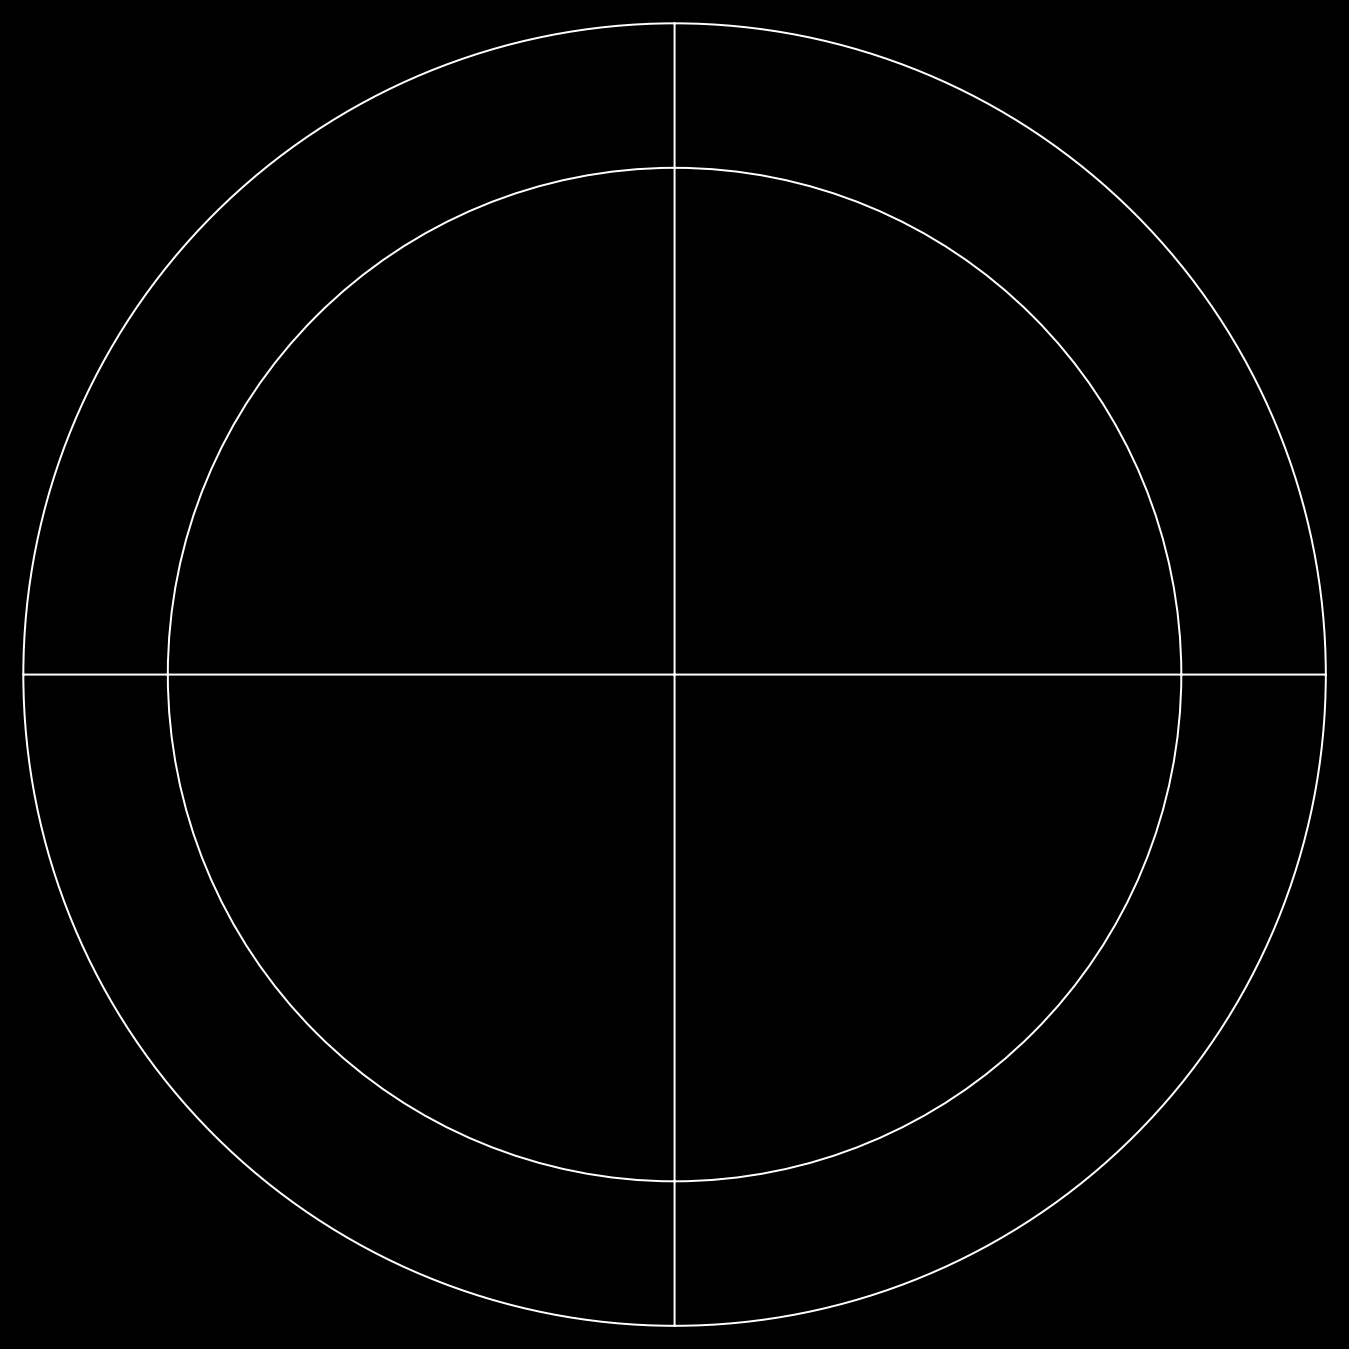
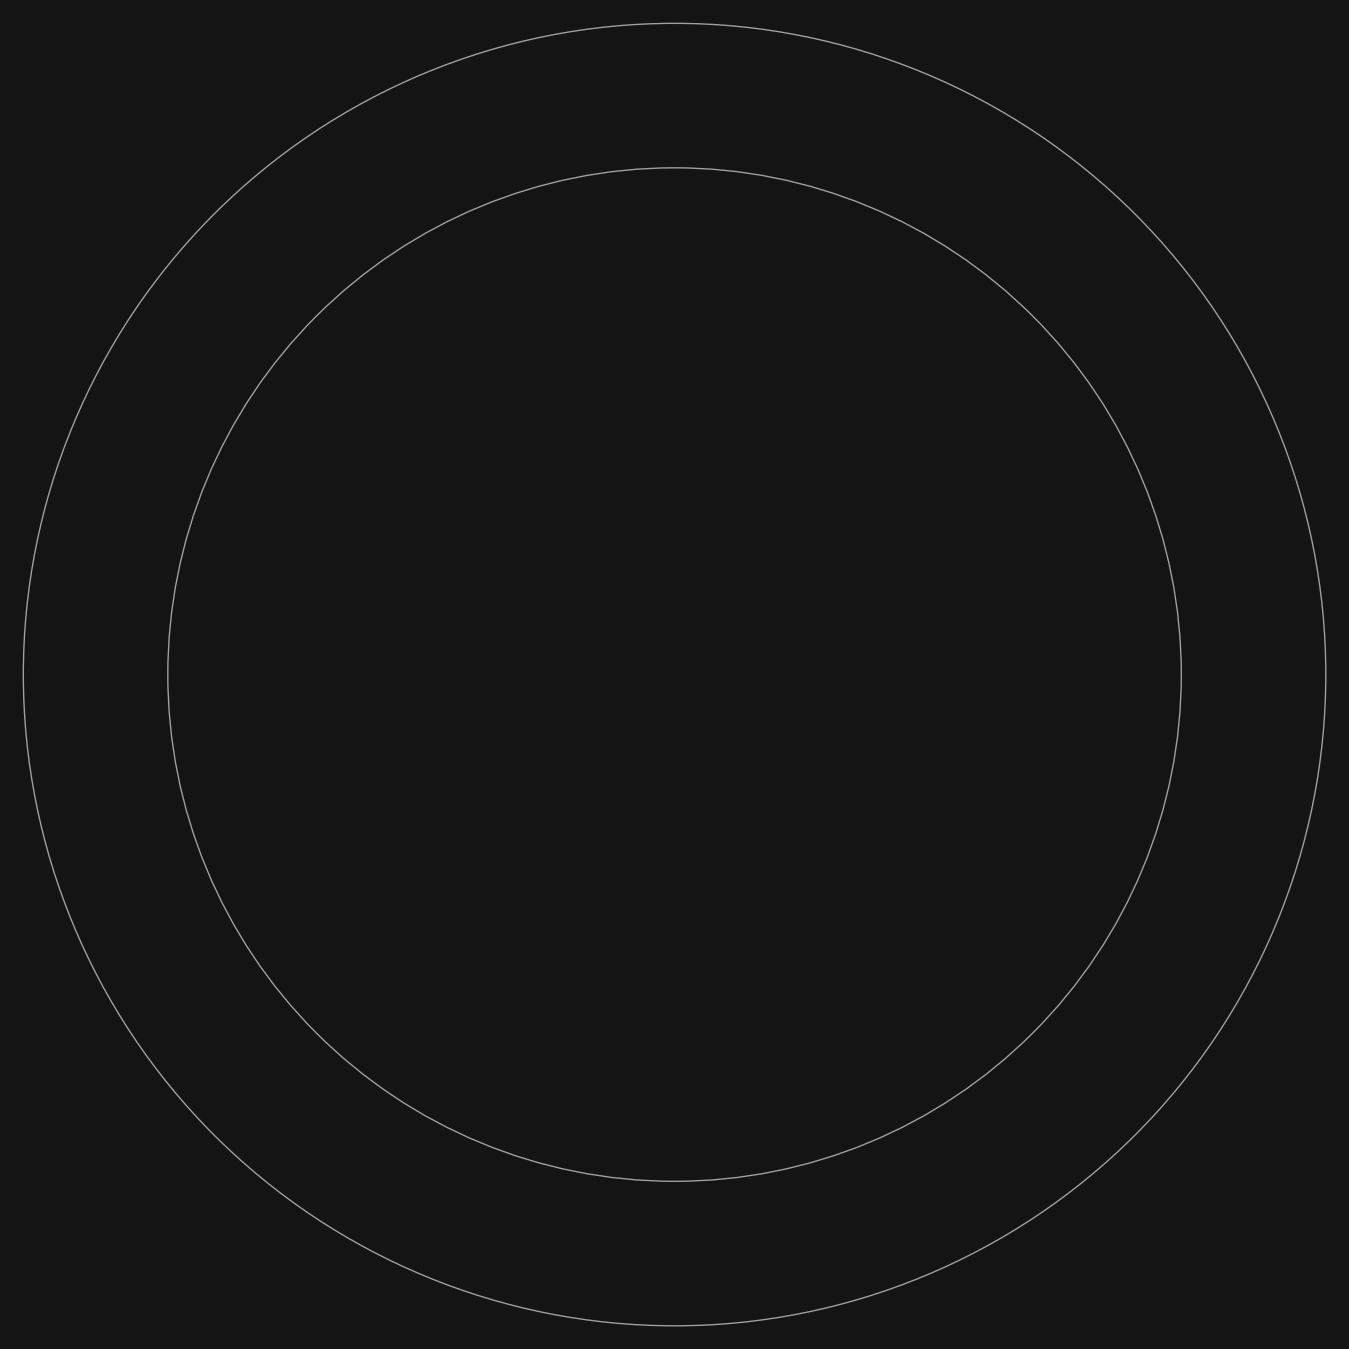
board edge: (674, 23) (674, 1325) -> none
board edge: (1325, 674) (23, 674) -> none

